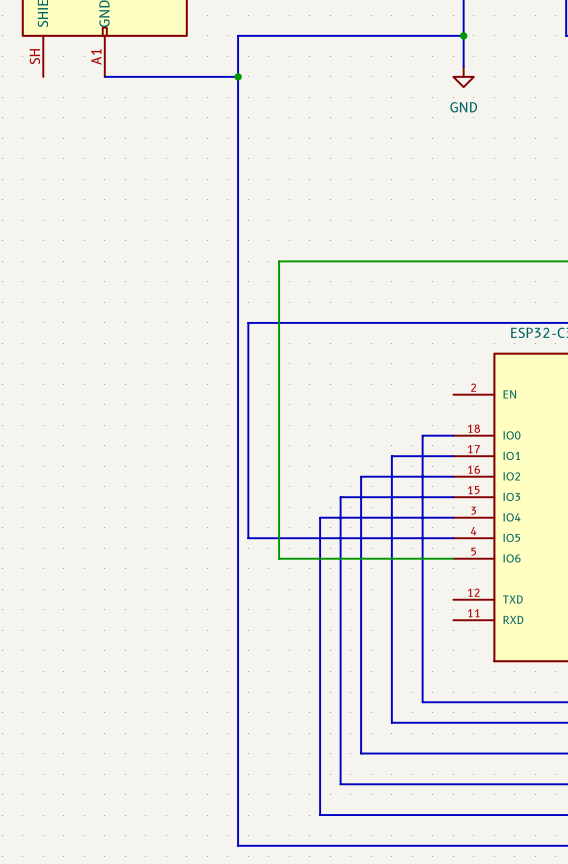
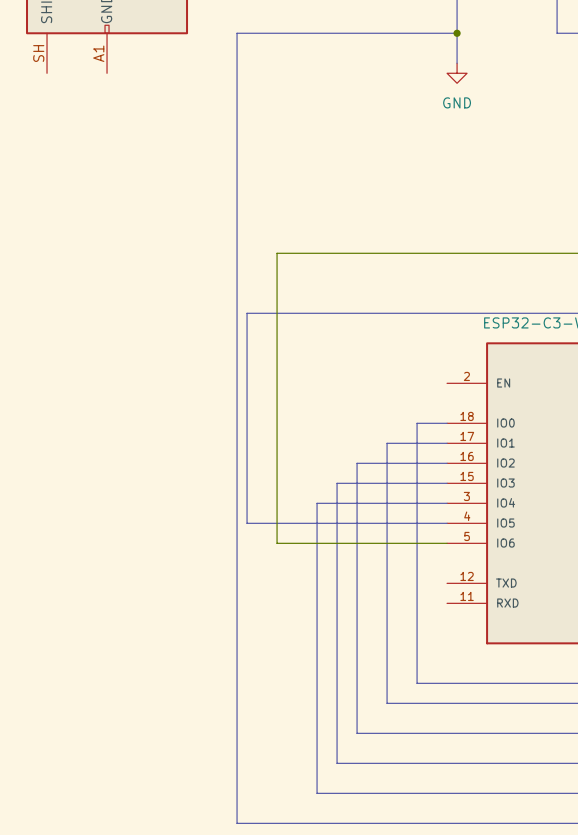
bus: (104, 76) (238, 76) -> none
junction: (238, 76) -> none

